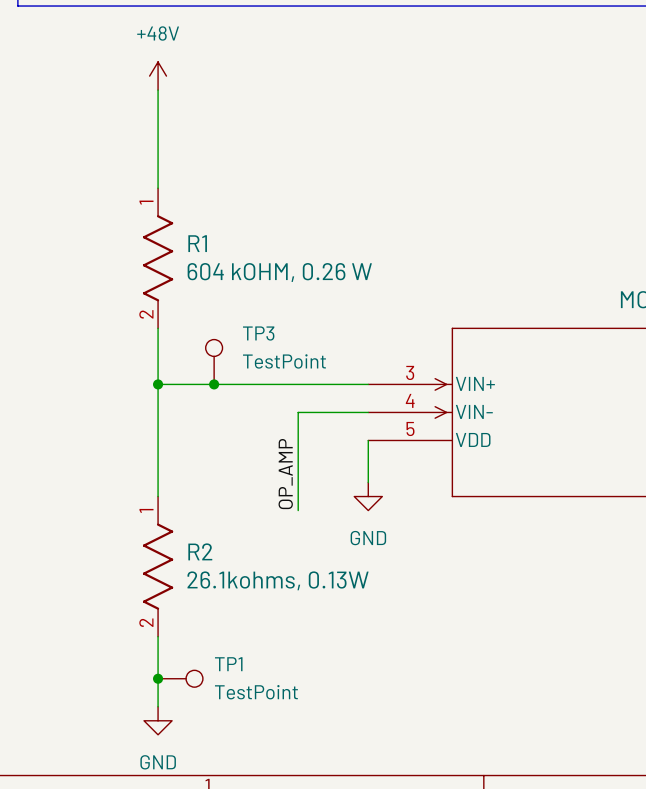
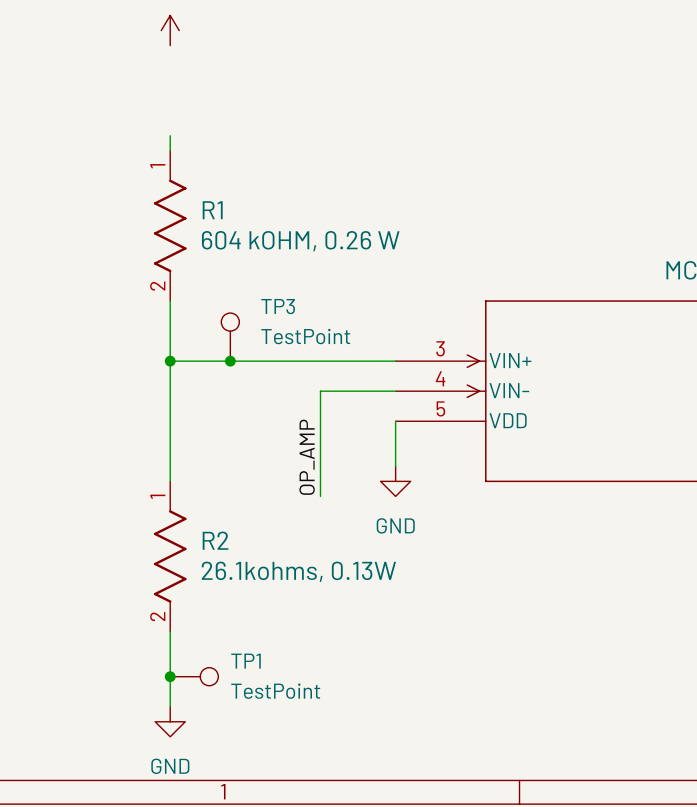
wire: (158, 90) (158, 174) -> none

